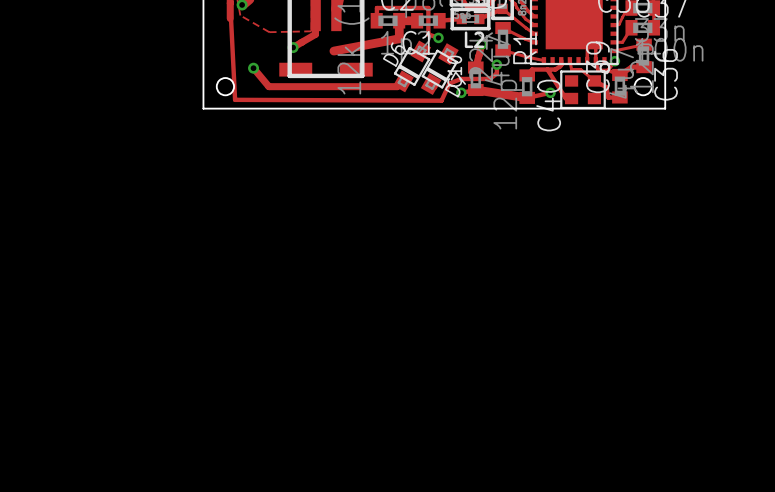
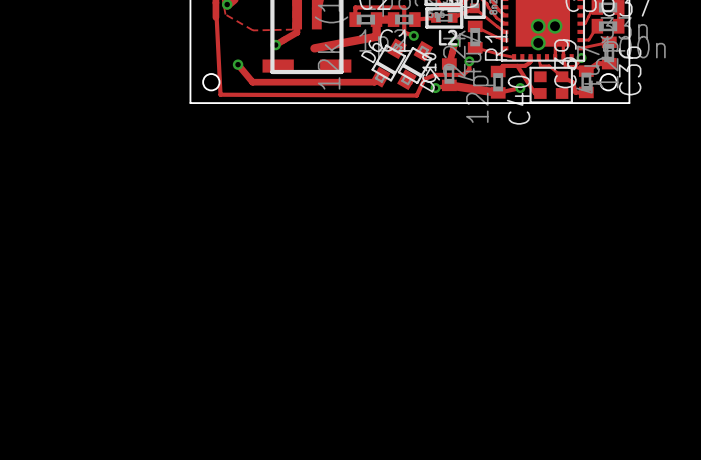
via: none -> (538, 26)
via: none -> (555, 26)
via: none -> (538, 42)

